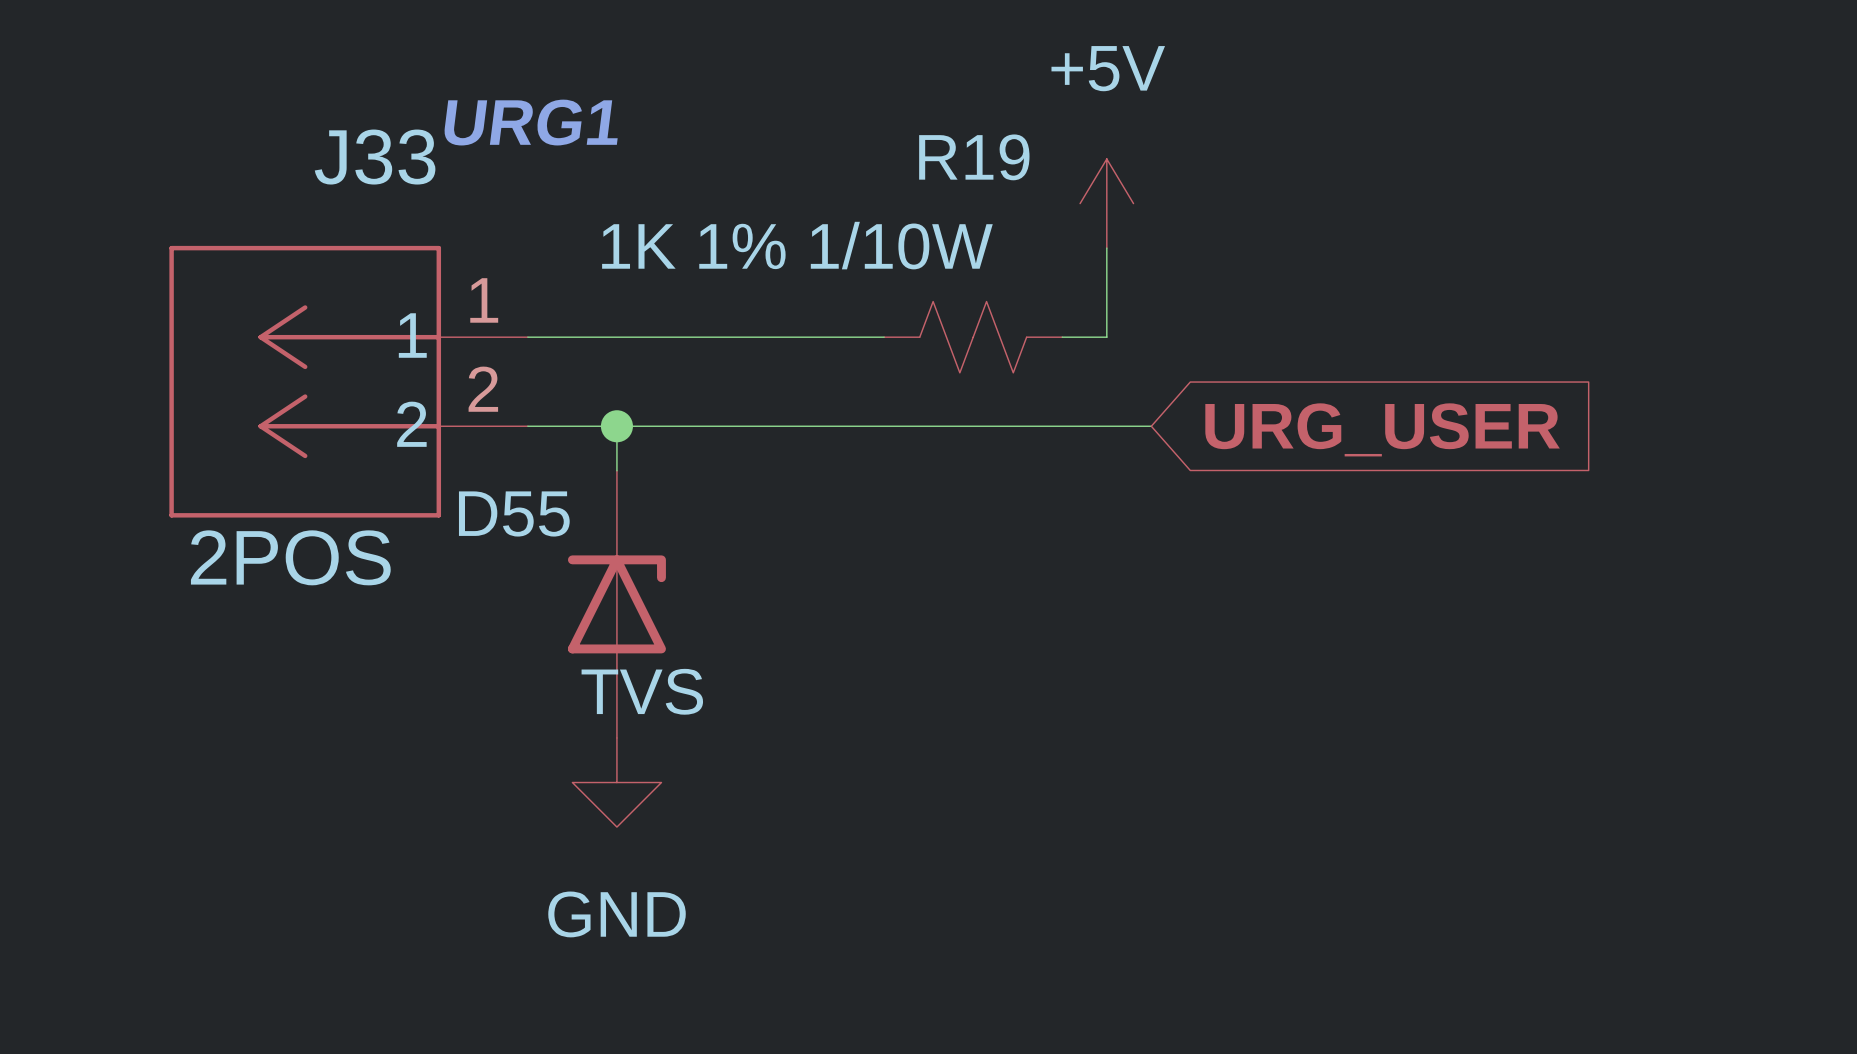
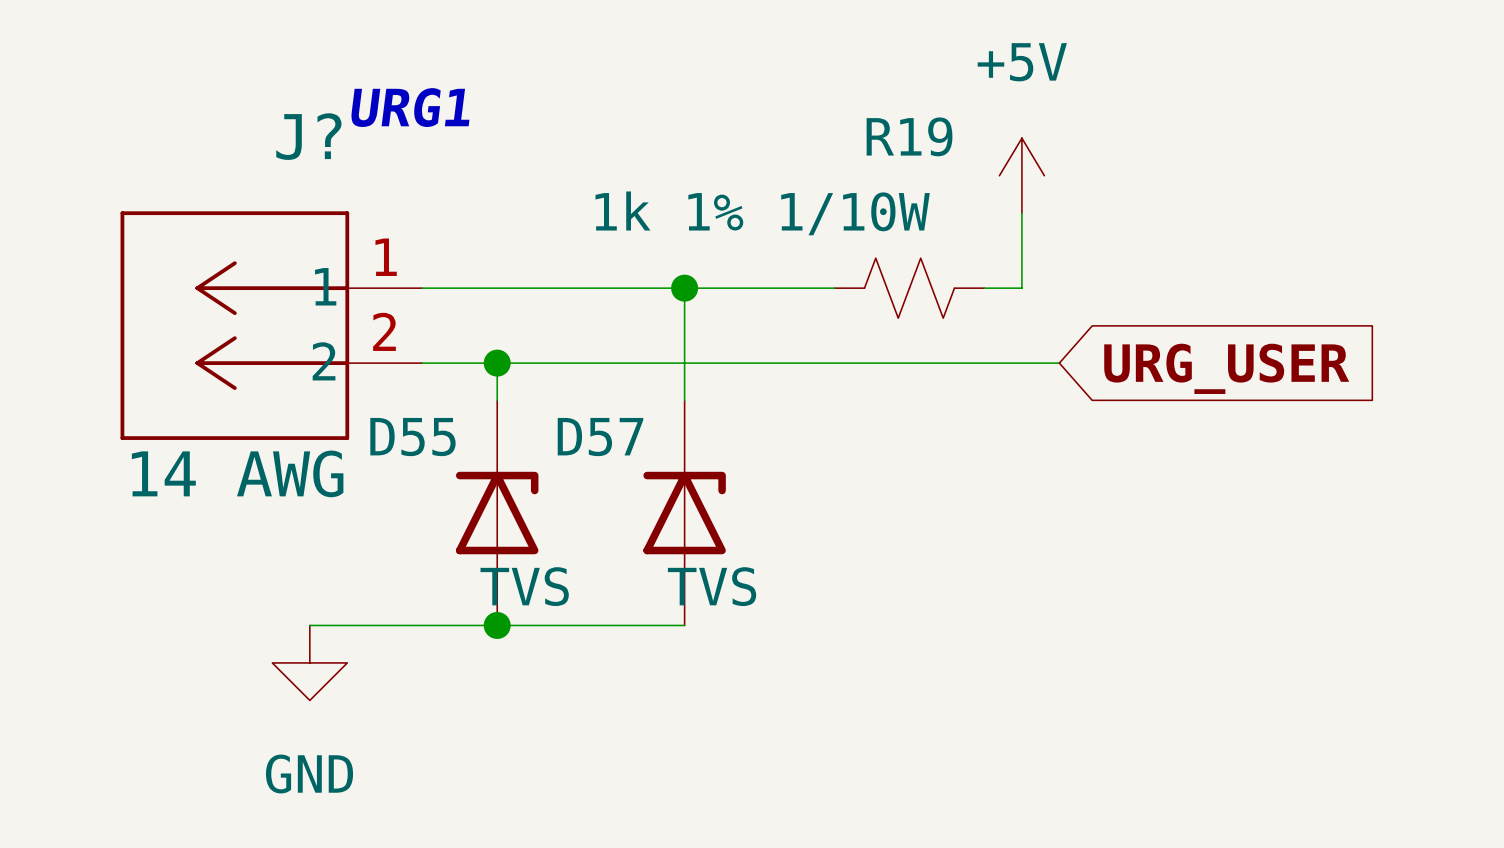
J33 name: J33 (375, 157) -> J? (308, 136)
power symbol position: +5V (1106, 203) -> +5V (1021, 175)
R19 value: 1K 1% 1/10W (797, 245) -> 1k 1% 1/10W (762, 213)
wire: (1106, 248) (1106, 337) (1062, 337) -> (1021, 213) (1021, 288) (984, 288)
wire: none -> (684, 288) (684, 400)
junction: none -> (684, 288)
wire: none -> (722, 288) (834, 288)
R19 position: (973, 337) -> (909, 288)
wire: none -> (946, 363) (1059, 363)
global label position: URG_USER (1382, 429) -> URG_USER (1226, 368)
J33 value: 2POS (290, 557) -> 14 AWG (237, 473)
D57: none -> TVS (684, 513)
wire: none -> (309, 625) (684, 625)
junction: none -> (497, 625)
power symbol position: GND (616, 782) -> GND (309, 662)

